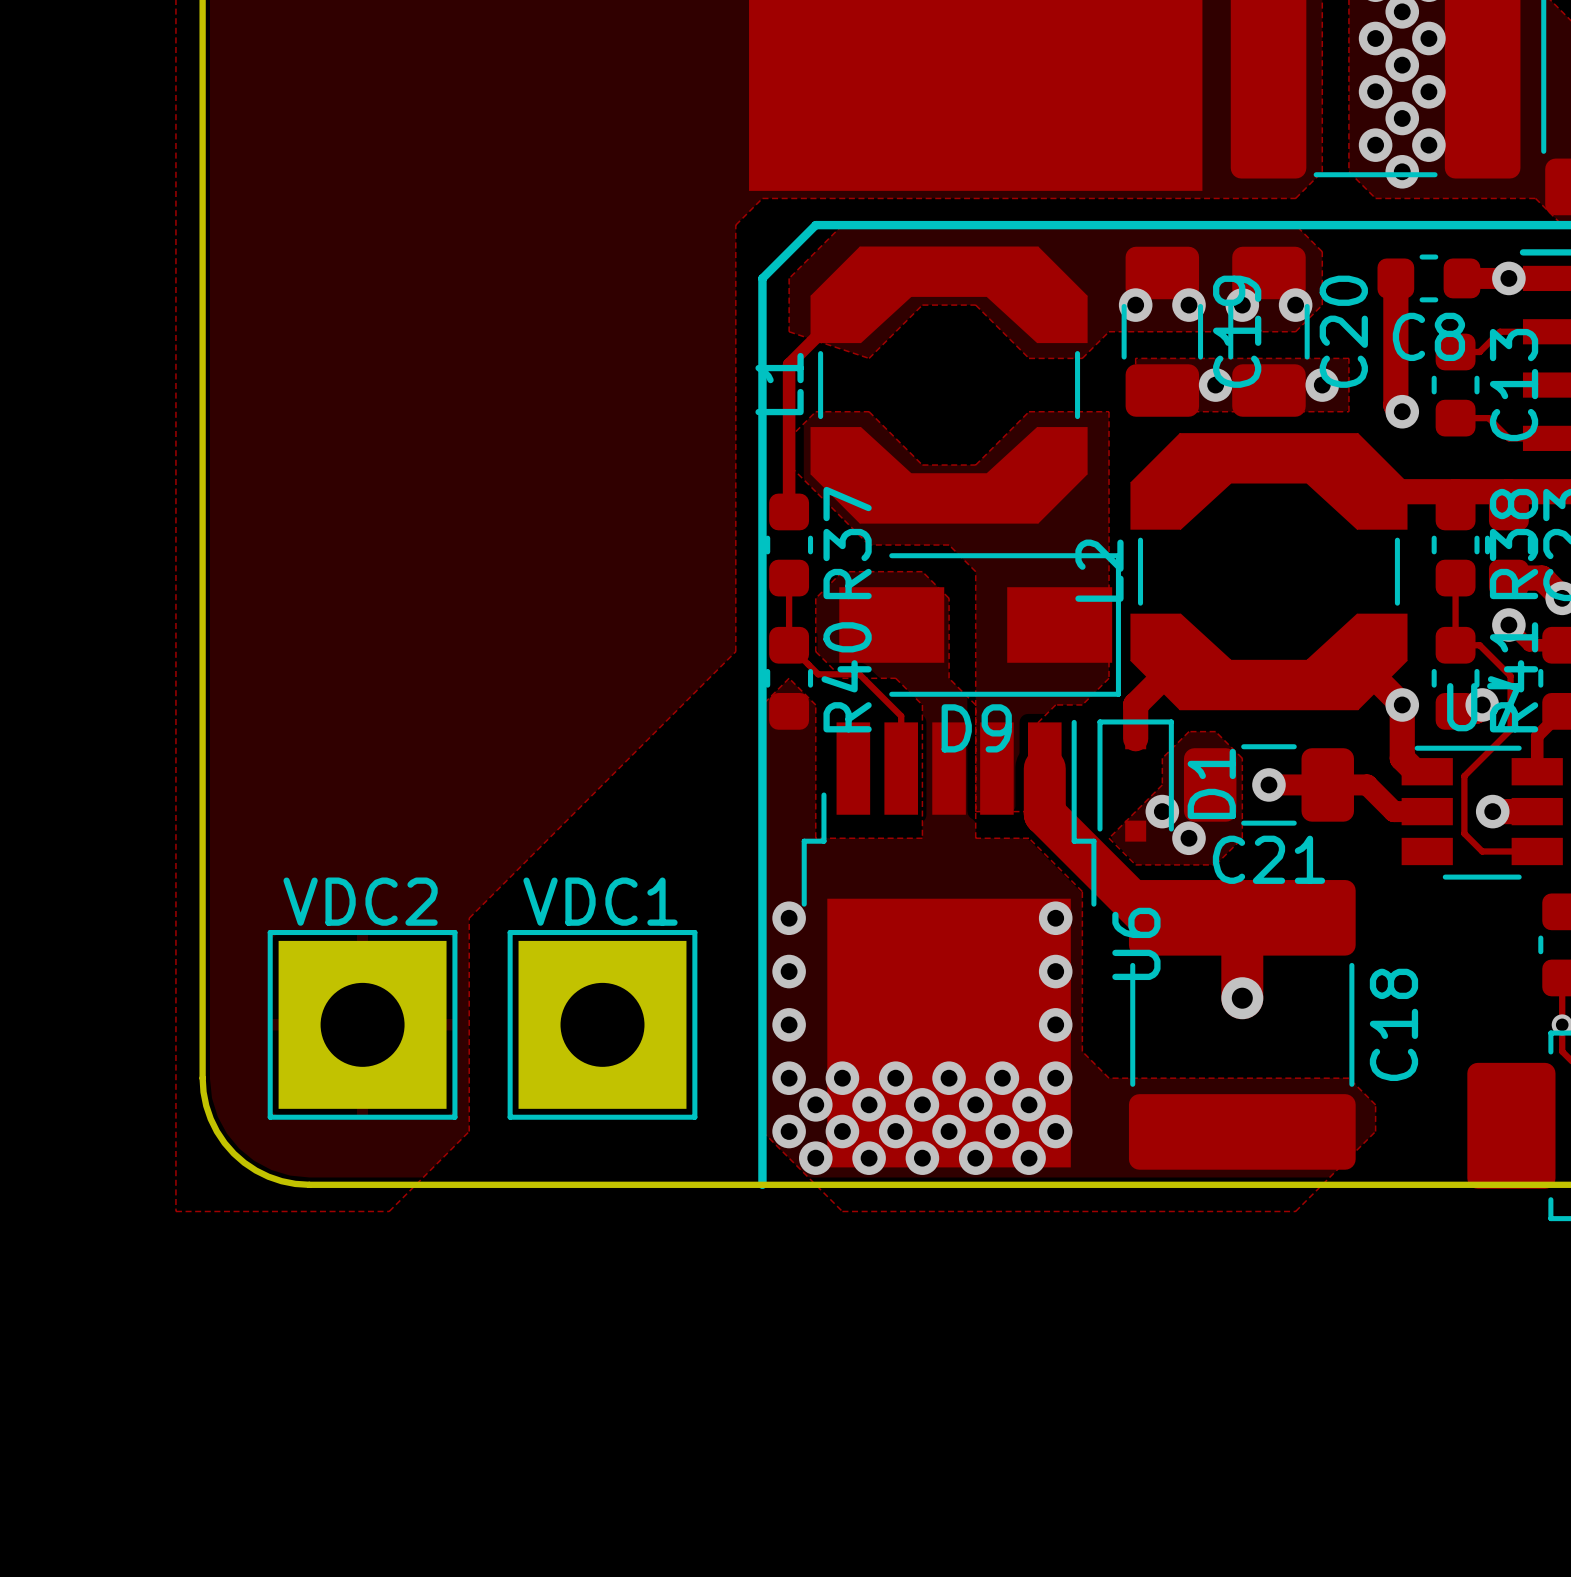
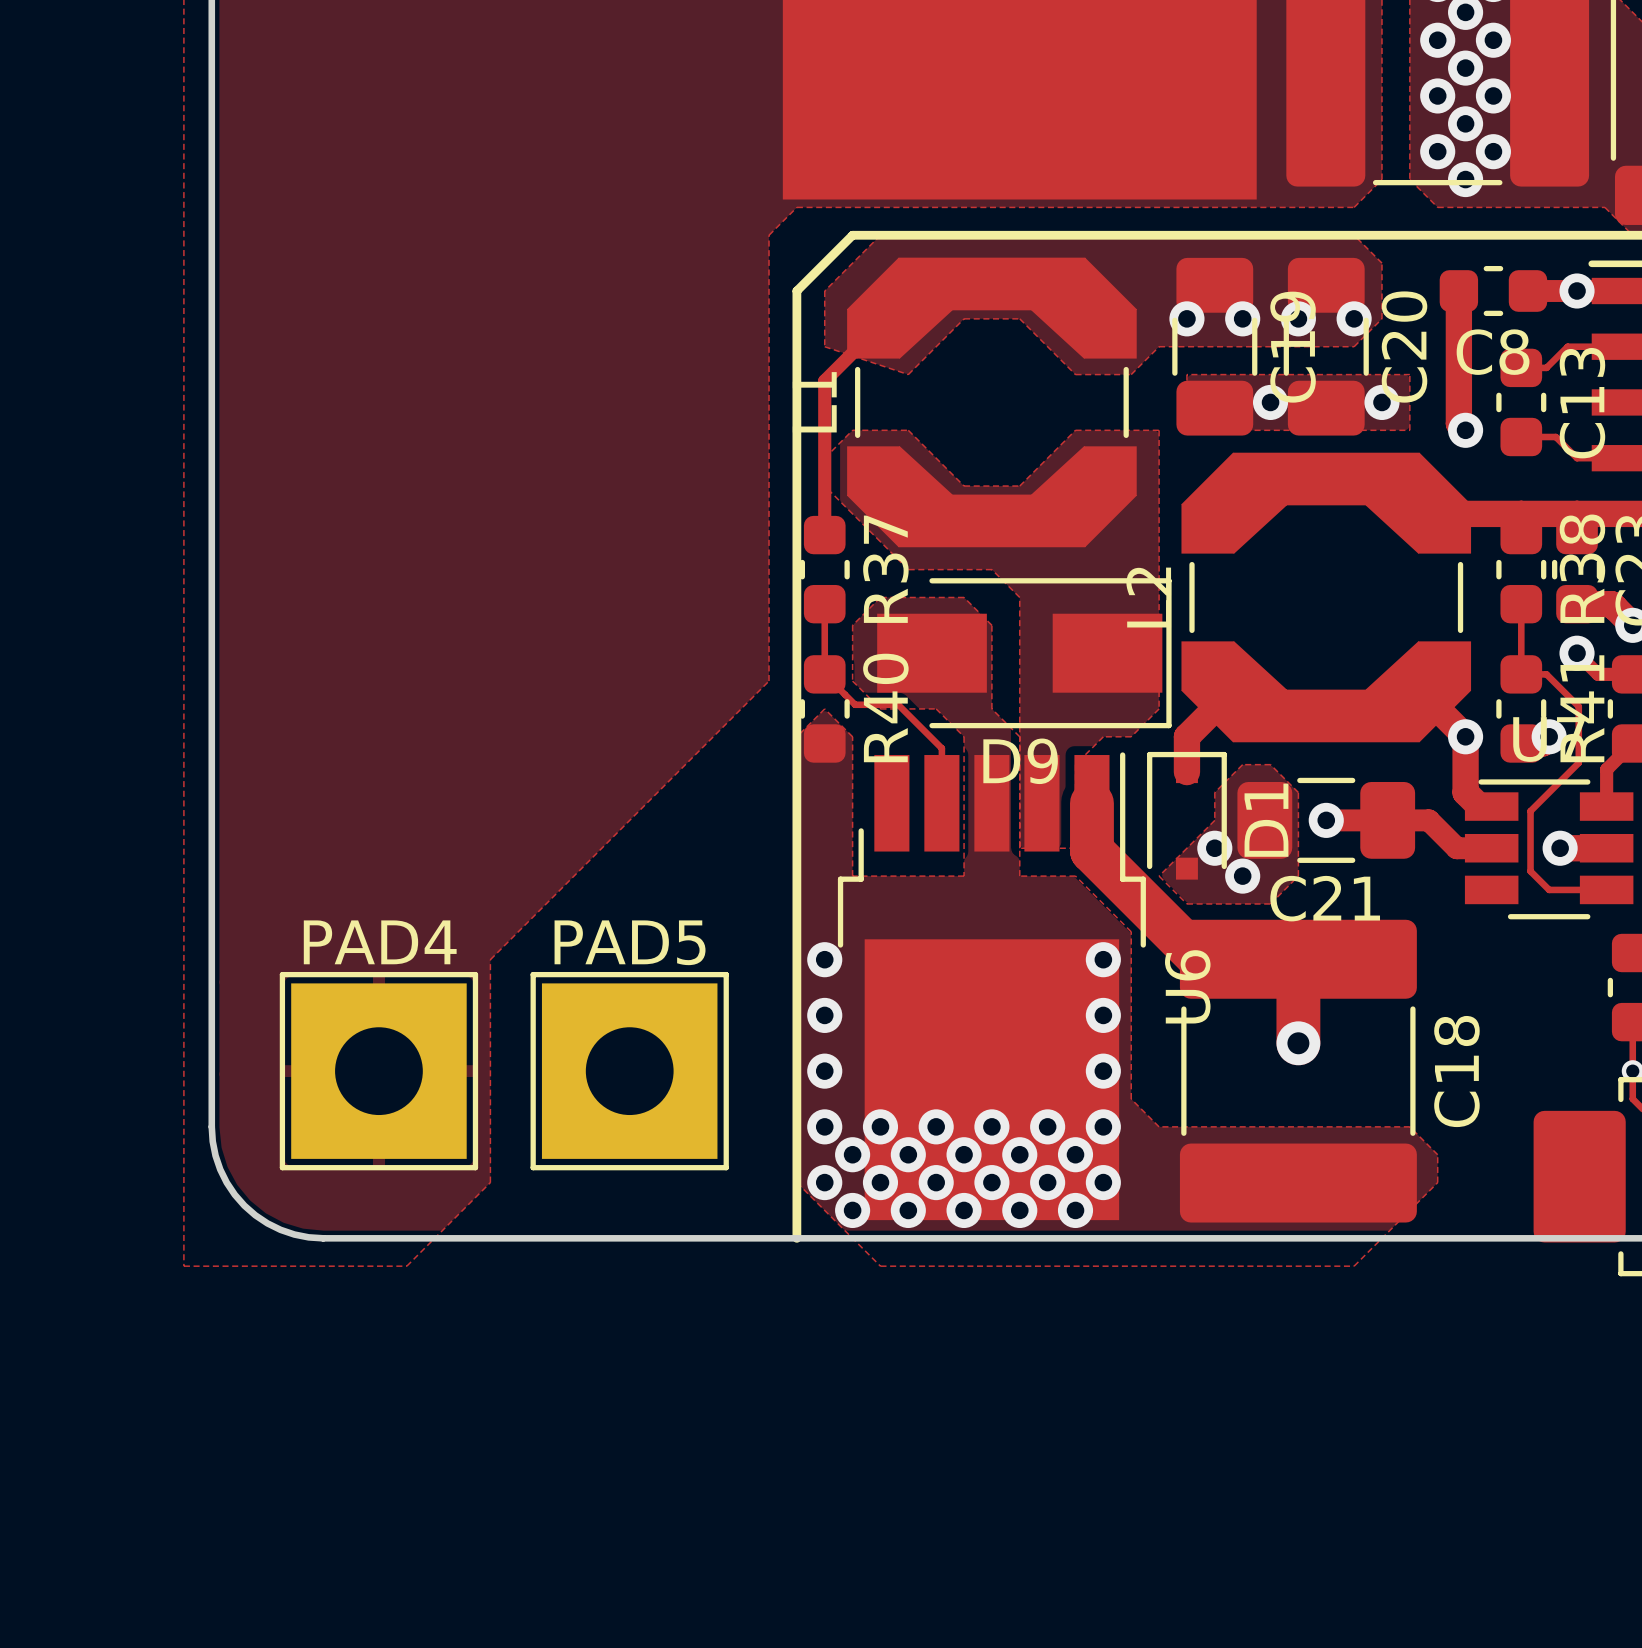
VDC2 name: VDC2 (360, 901) -> PAD4 (380, 942)
VDC1 name: VDC1 (600, 901) -> PAD5 (630, 942)

